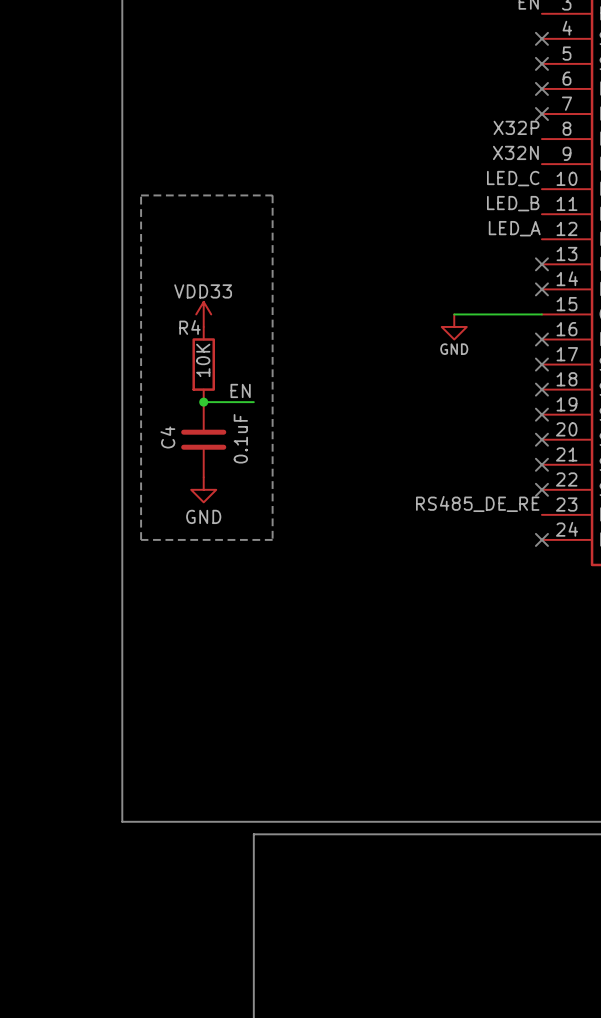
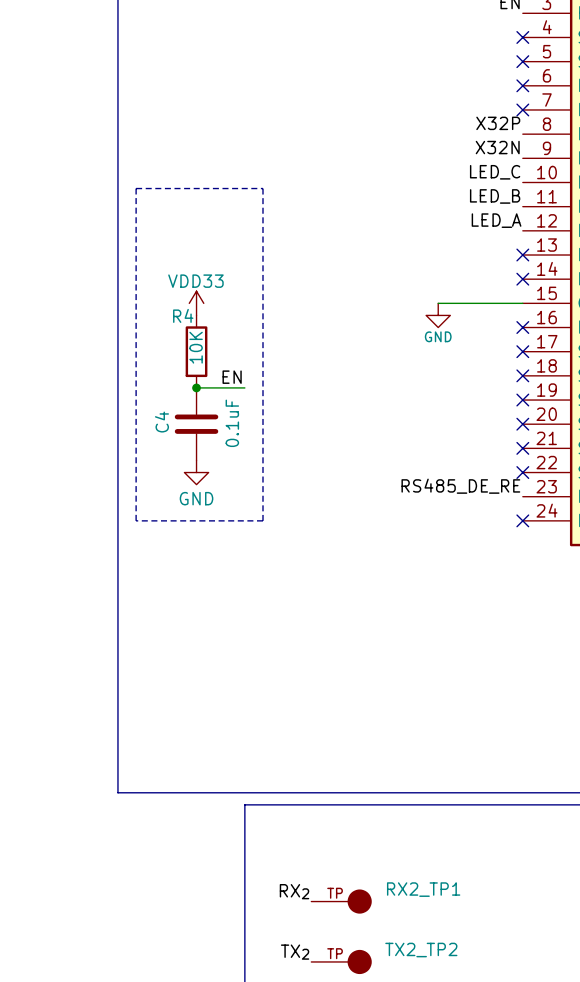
label: none -> RX2 (294, 891)
RX2_TP1: none -> (341, 901)
label: none -> TX2 (295, 952)
TX2_TP2: none -> (341, 961)

